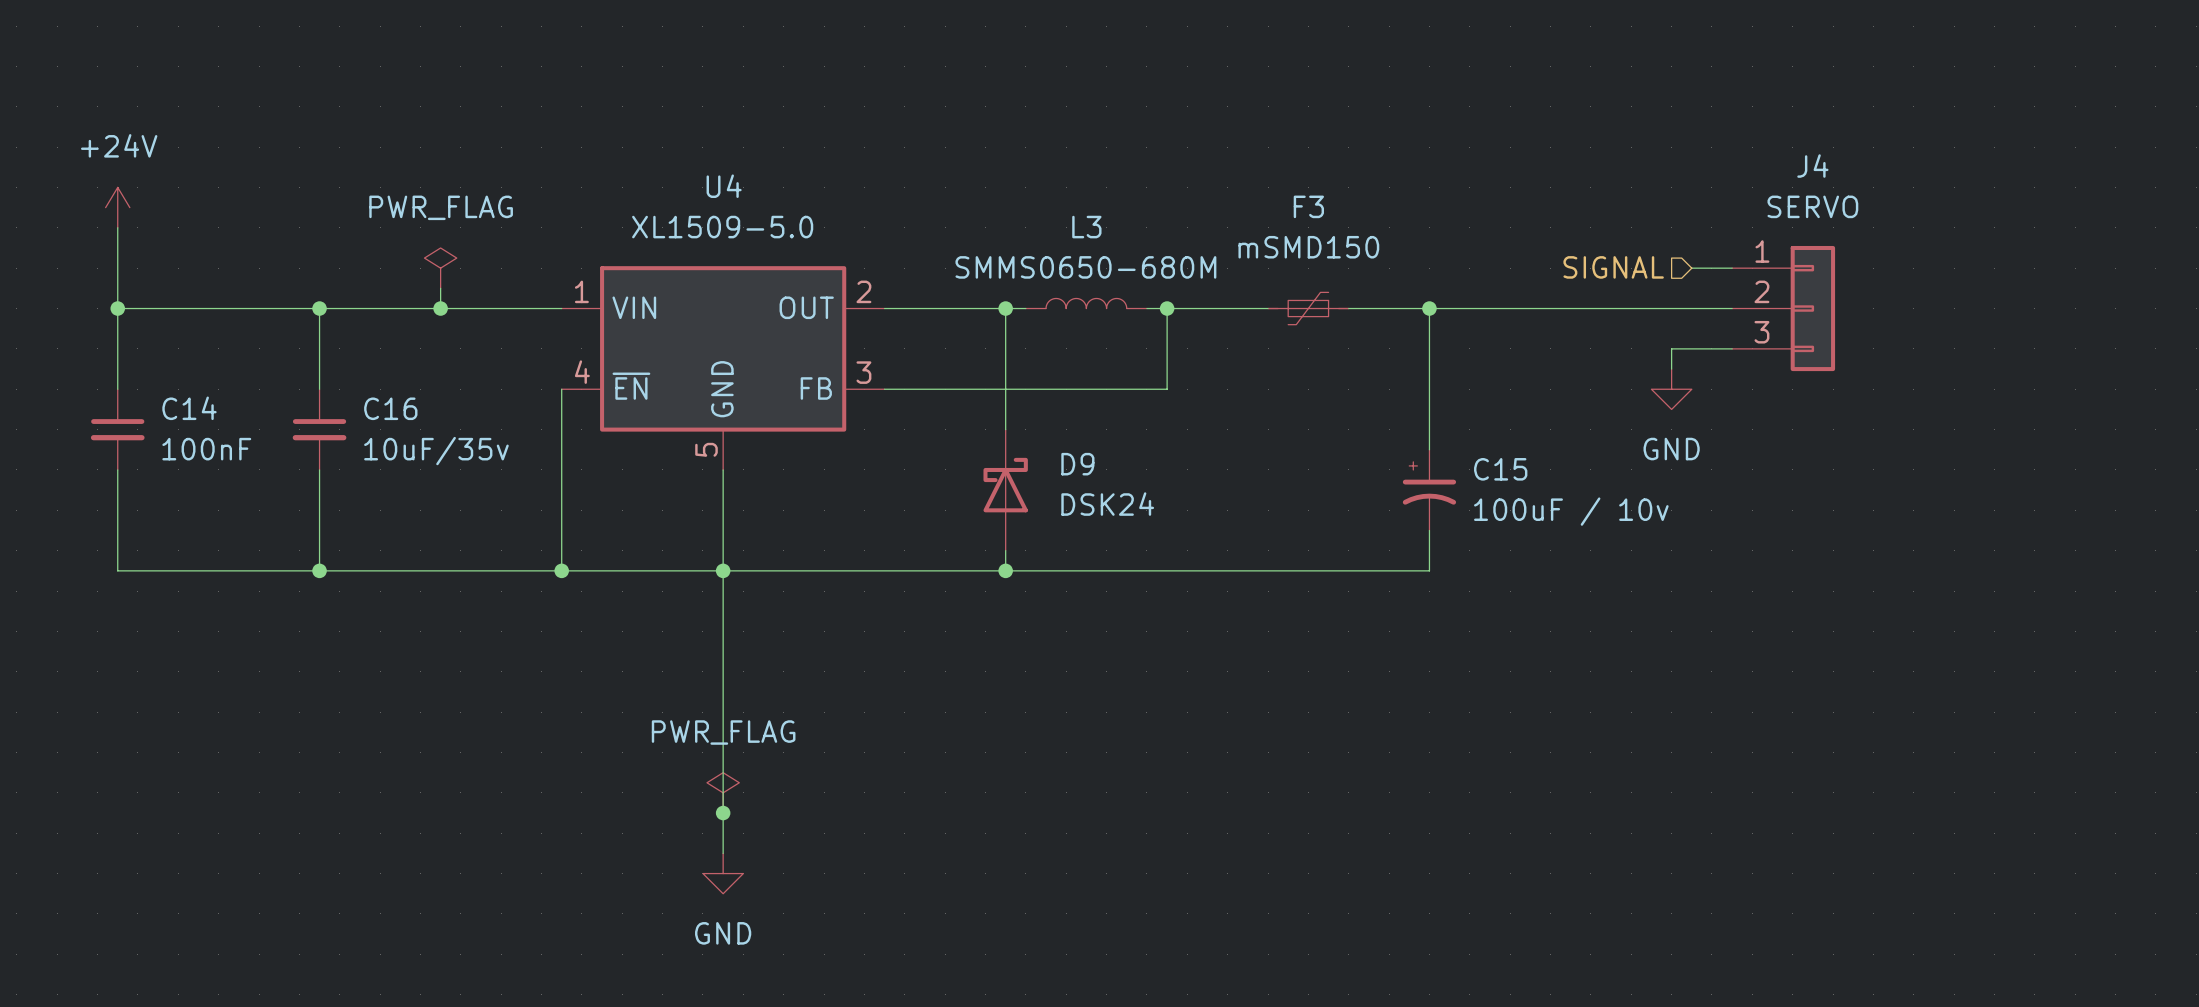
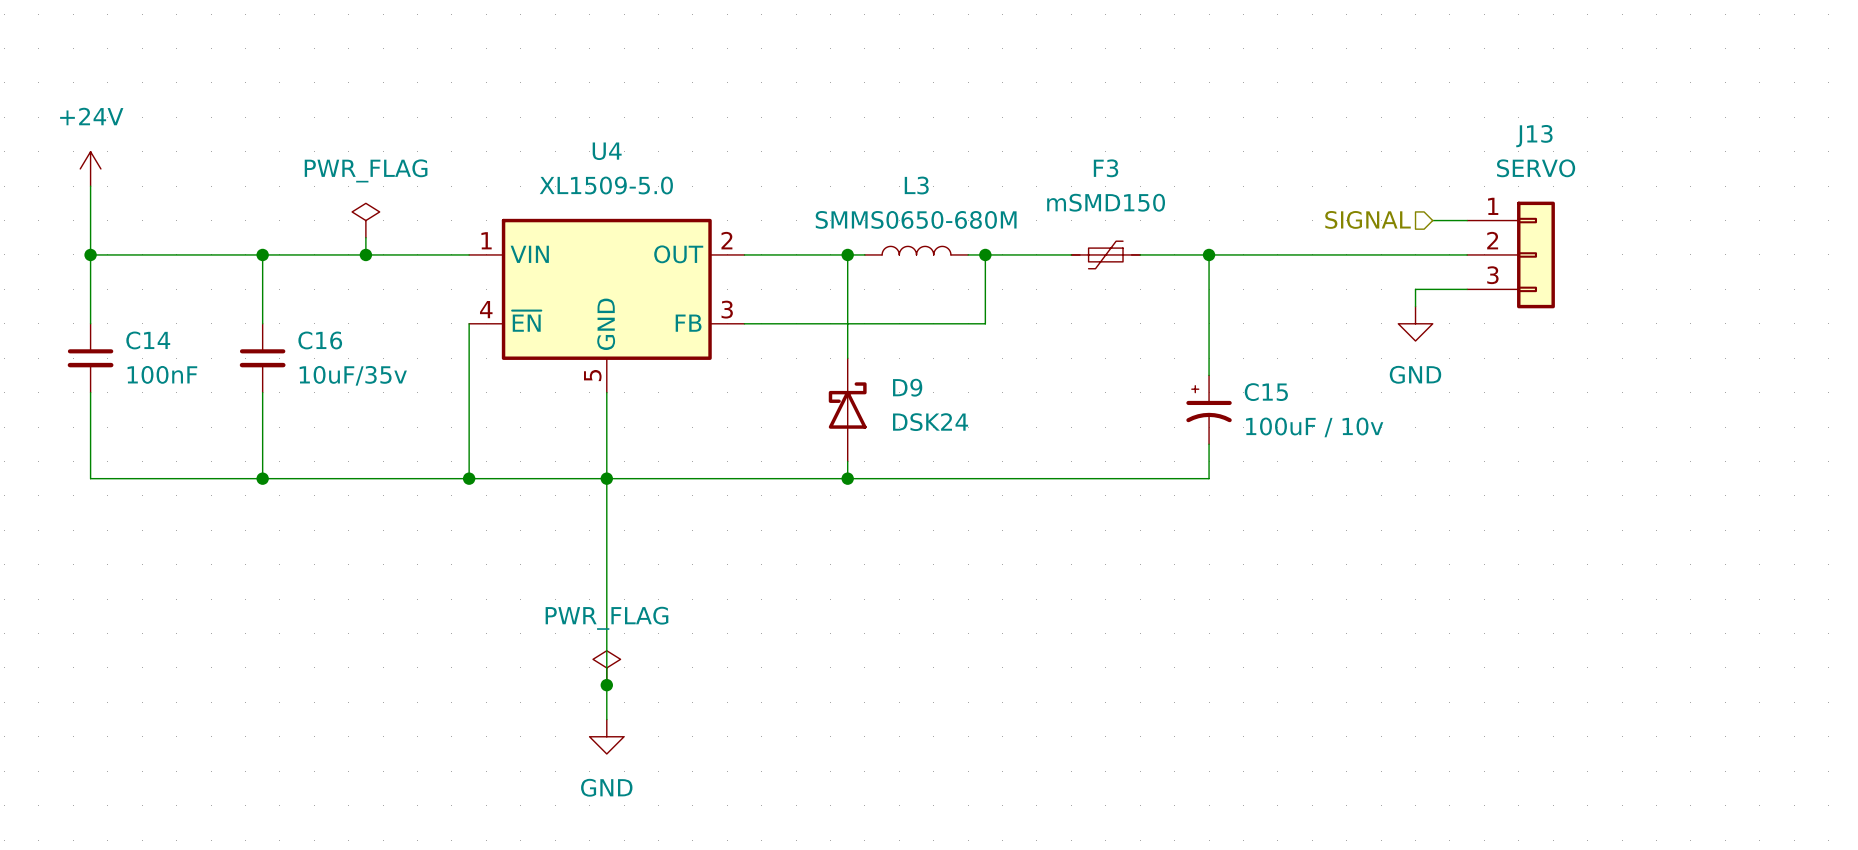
J4 name: J4 (1812, 166) -> J13 (1534, 136)

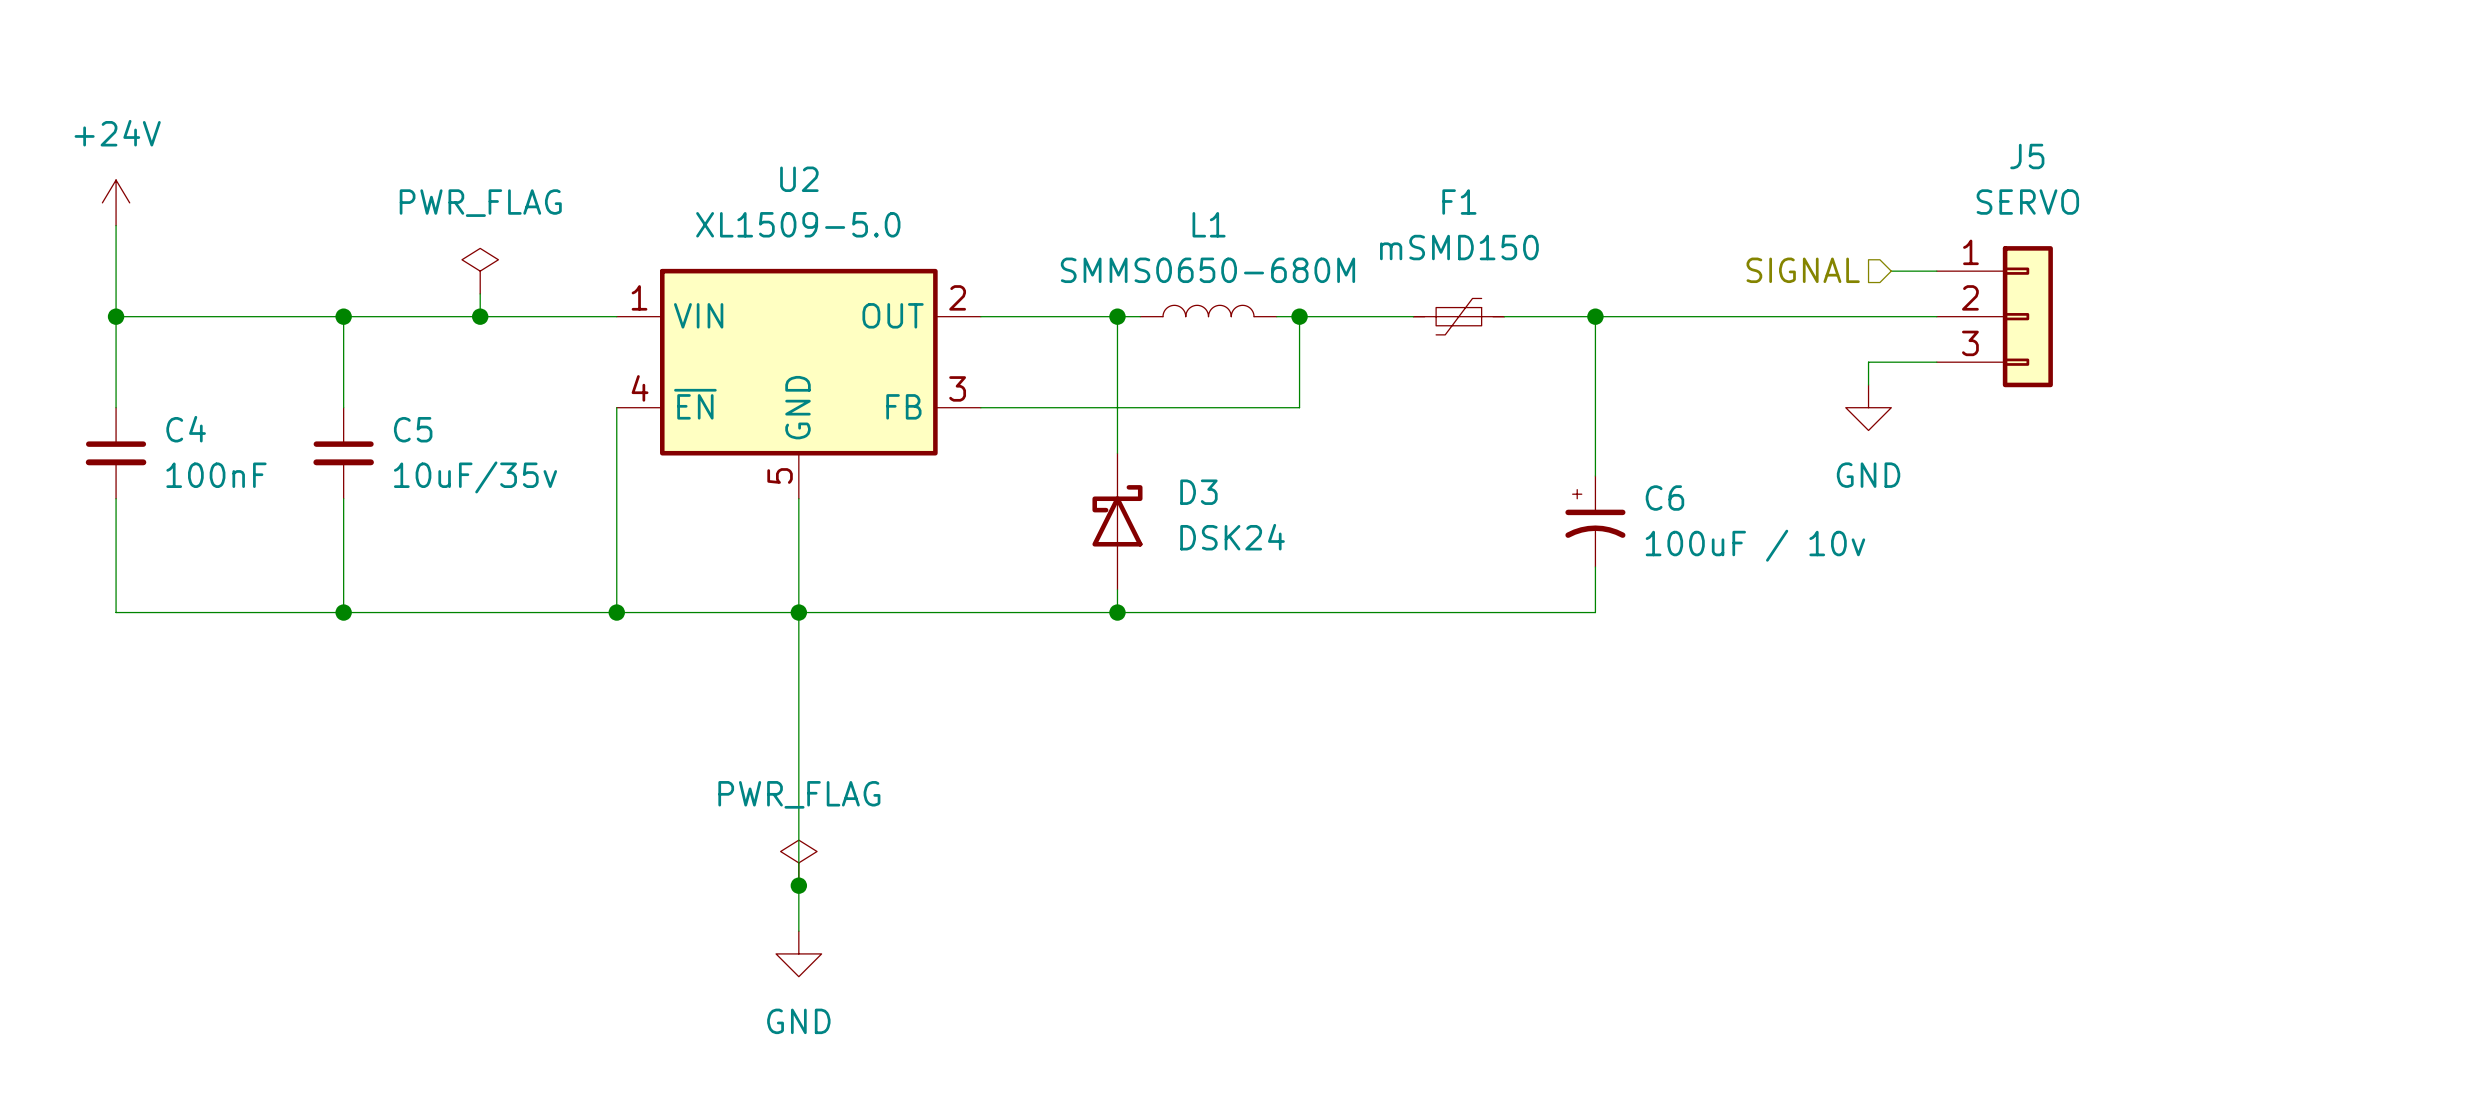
J13 name: J13 (1534, 136) -> J5 (2027, 156)
U4 name: U4 (607, 151) -> U2 (799, 179)
F3 name: F3 (1106, 168) -> F1 (1459, 202)
L3 name: L3 (916, 185) -> L1 (1209, 224)
C14 name: C14 (148, 340) -> C4 (186, 429)
C16 name: C16 (320, 340) -> C5 (413, 429)
D9 name: D9 (907, 387) -> D3 (1198, 492)
C15 name: C15 (1266, 392) -> C6 (1664, 498)

